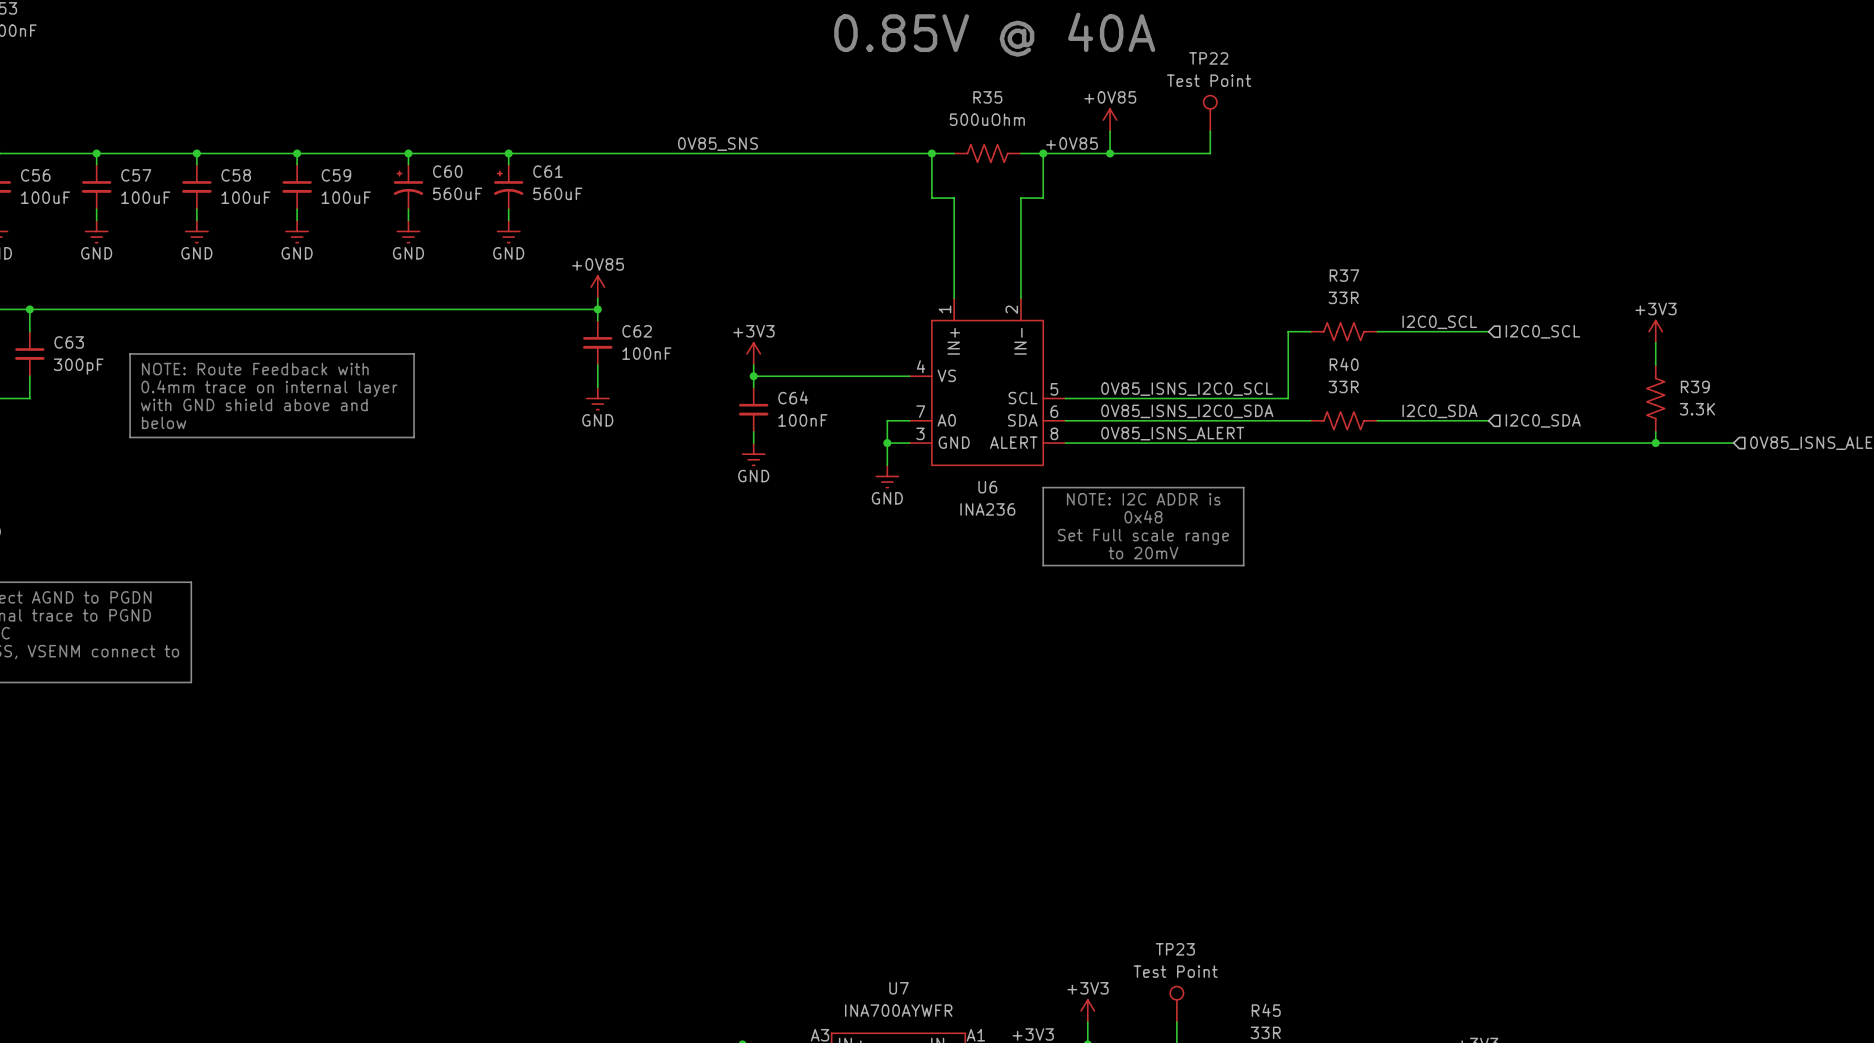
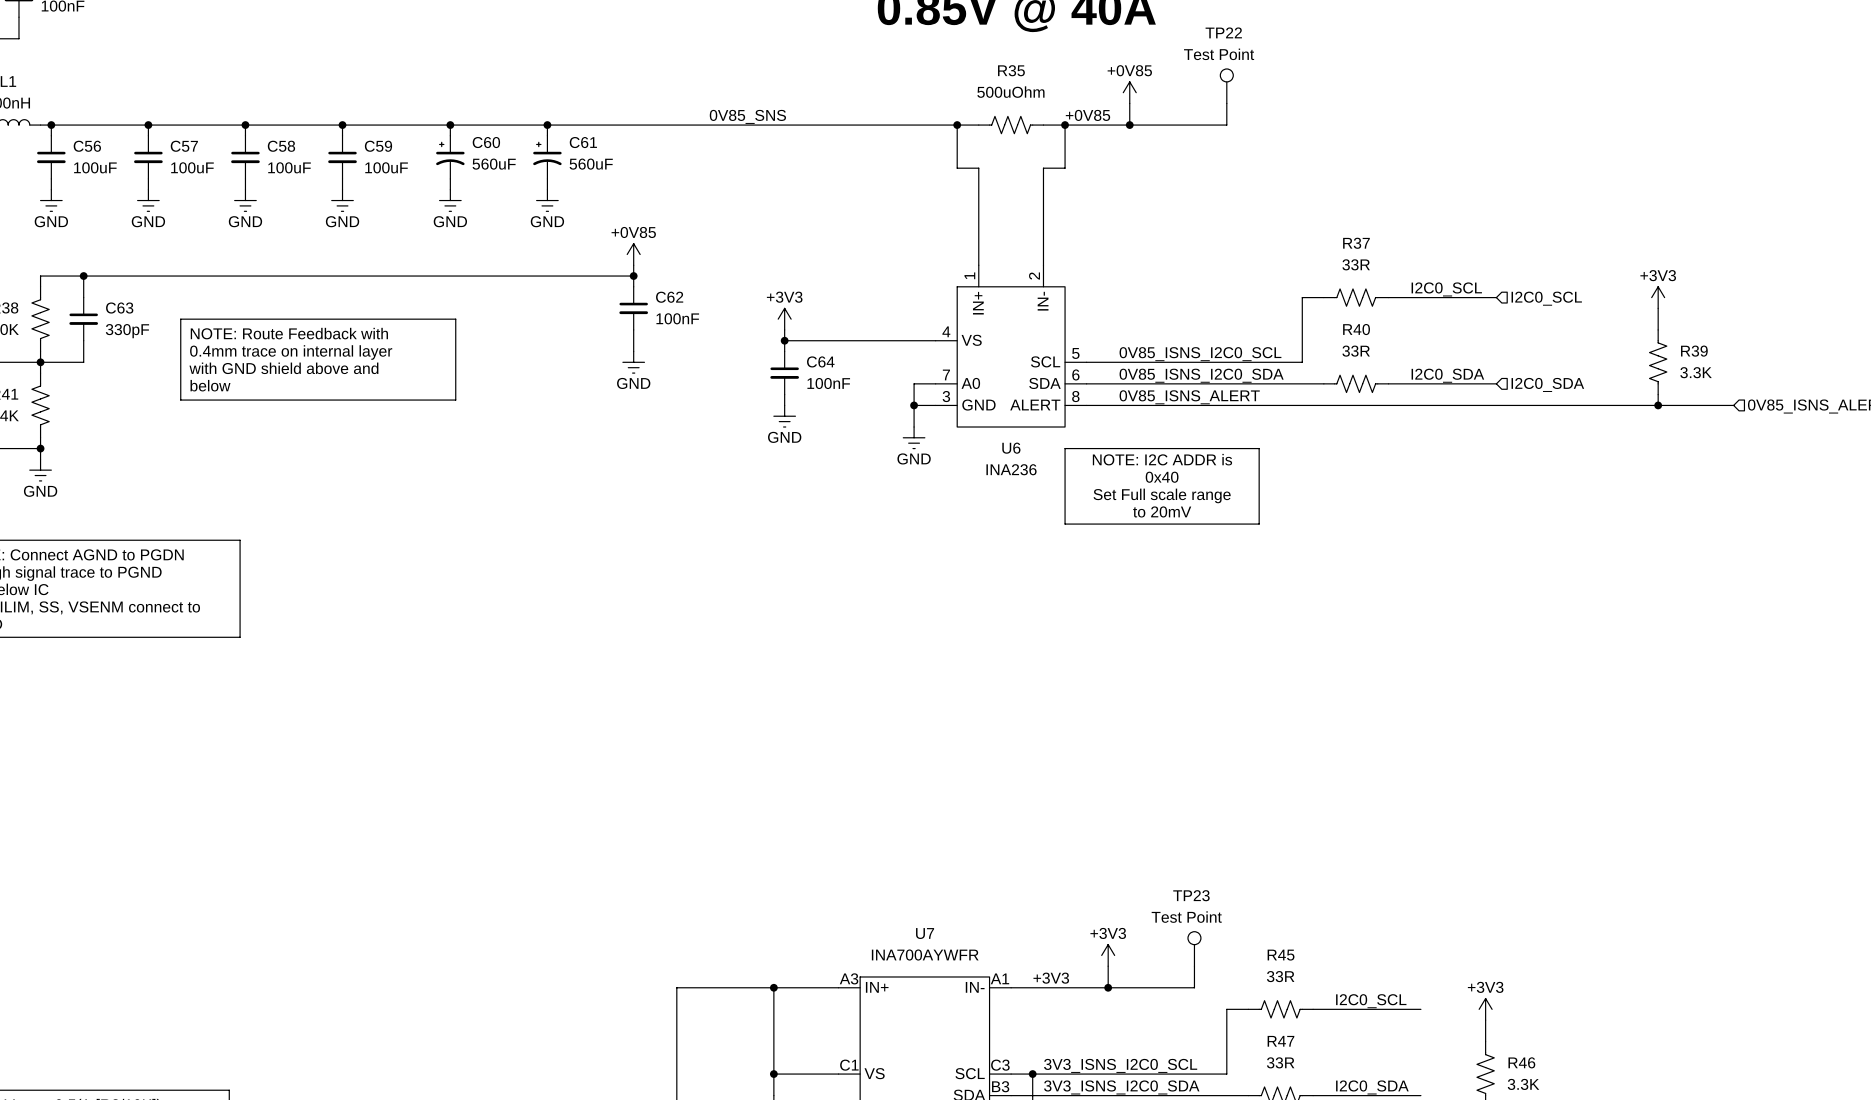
C63 value: 300pF (78, 366) -> 330pF (127, 331)
text: 0x48 (1143, 516) -> 0x40 (1162, 477)

